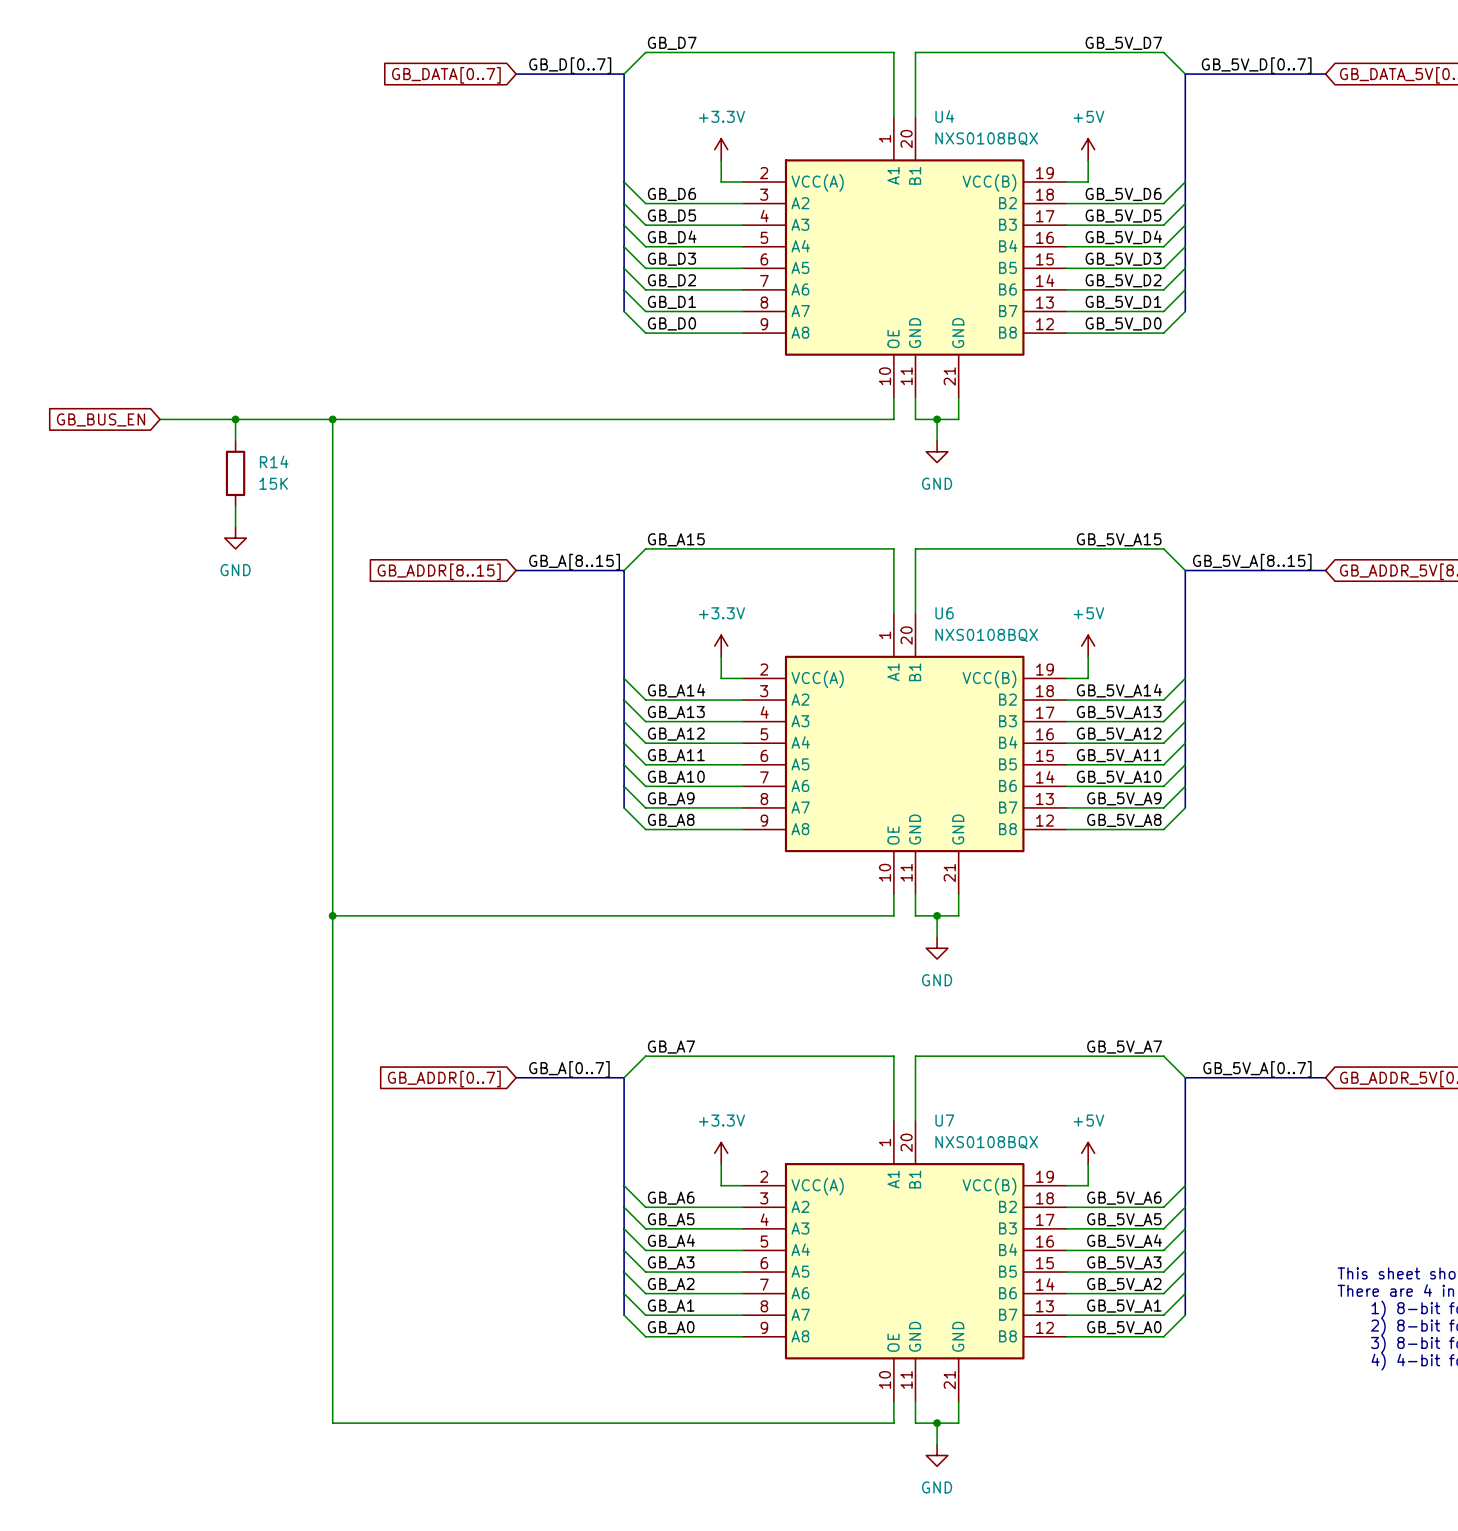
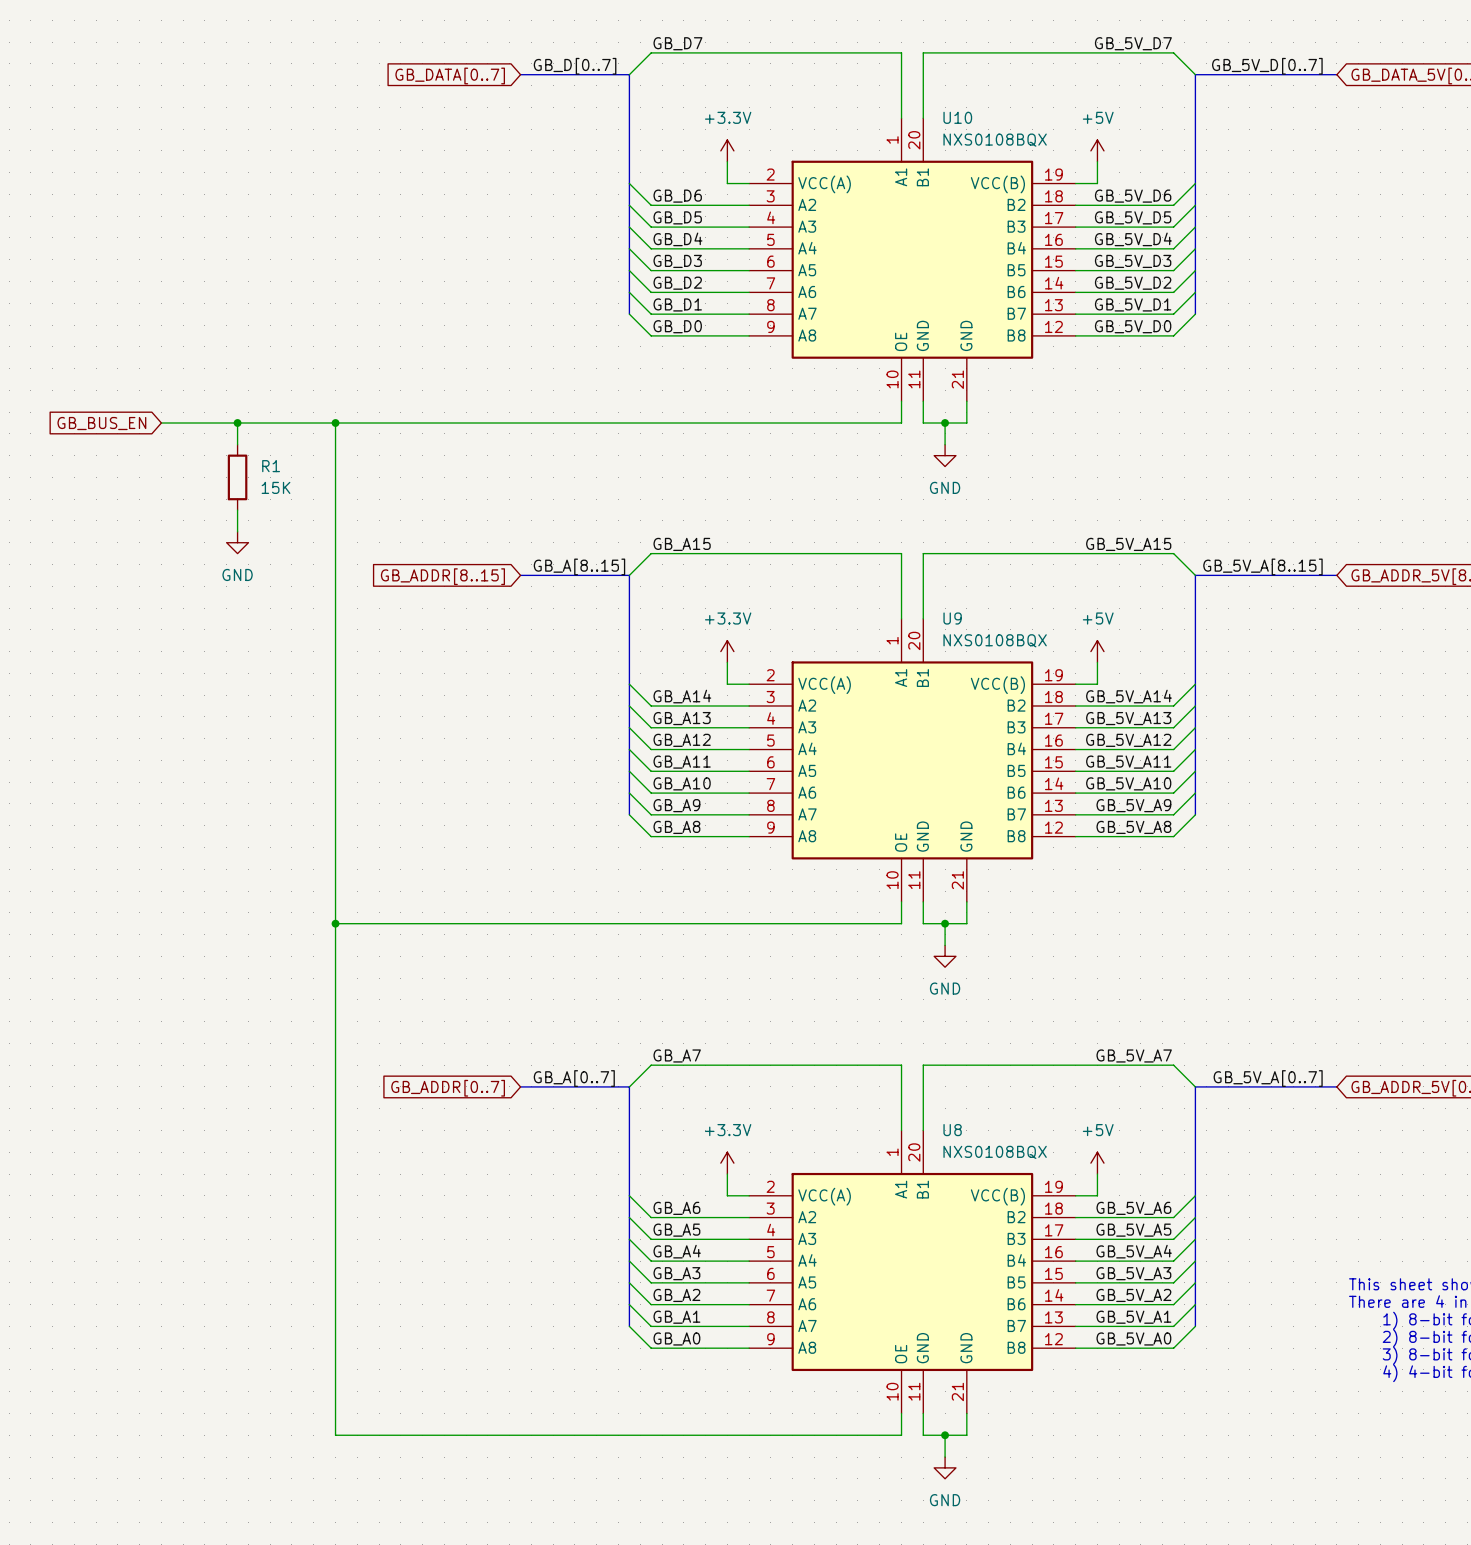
U4 name: U4 (944, 116) -> U10 (957, 117)
R14 name: R14 (274, 461) -> R1 (271, 466)
U6 name: U6 (944, 613) -> U9 (952, 618)
U7 name: U7 (944, 1120) -> U8 (952, 1130)

